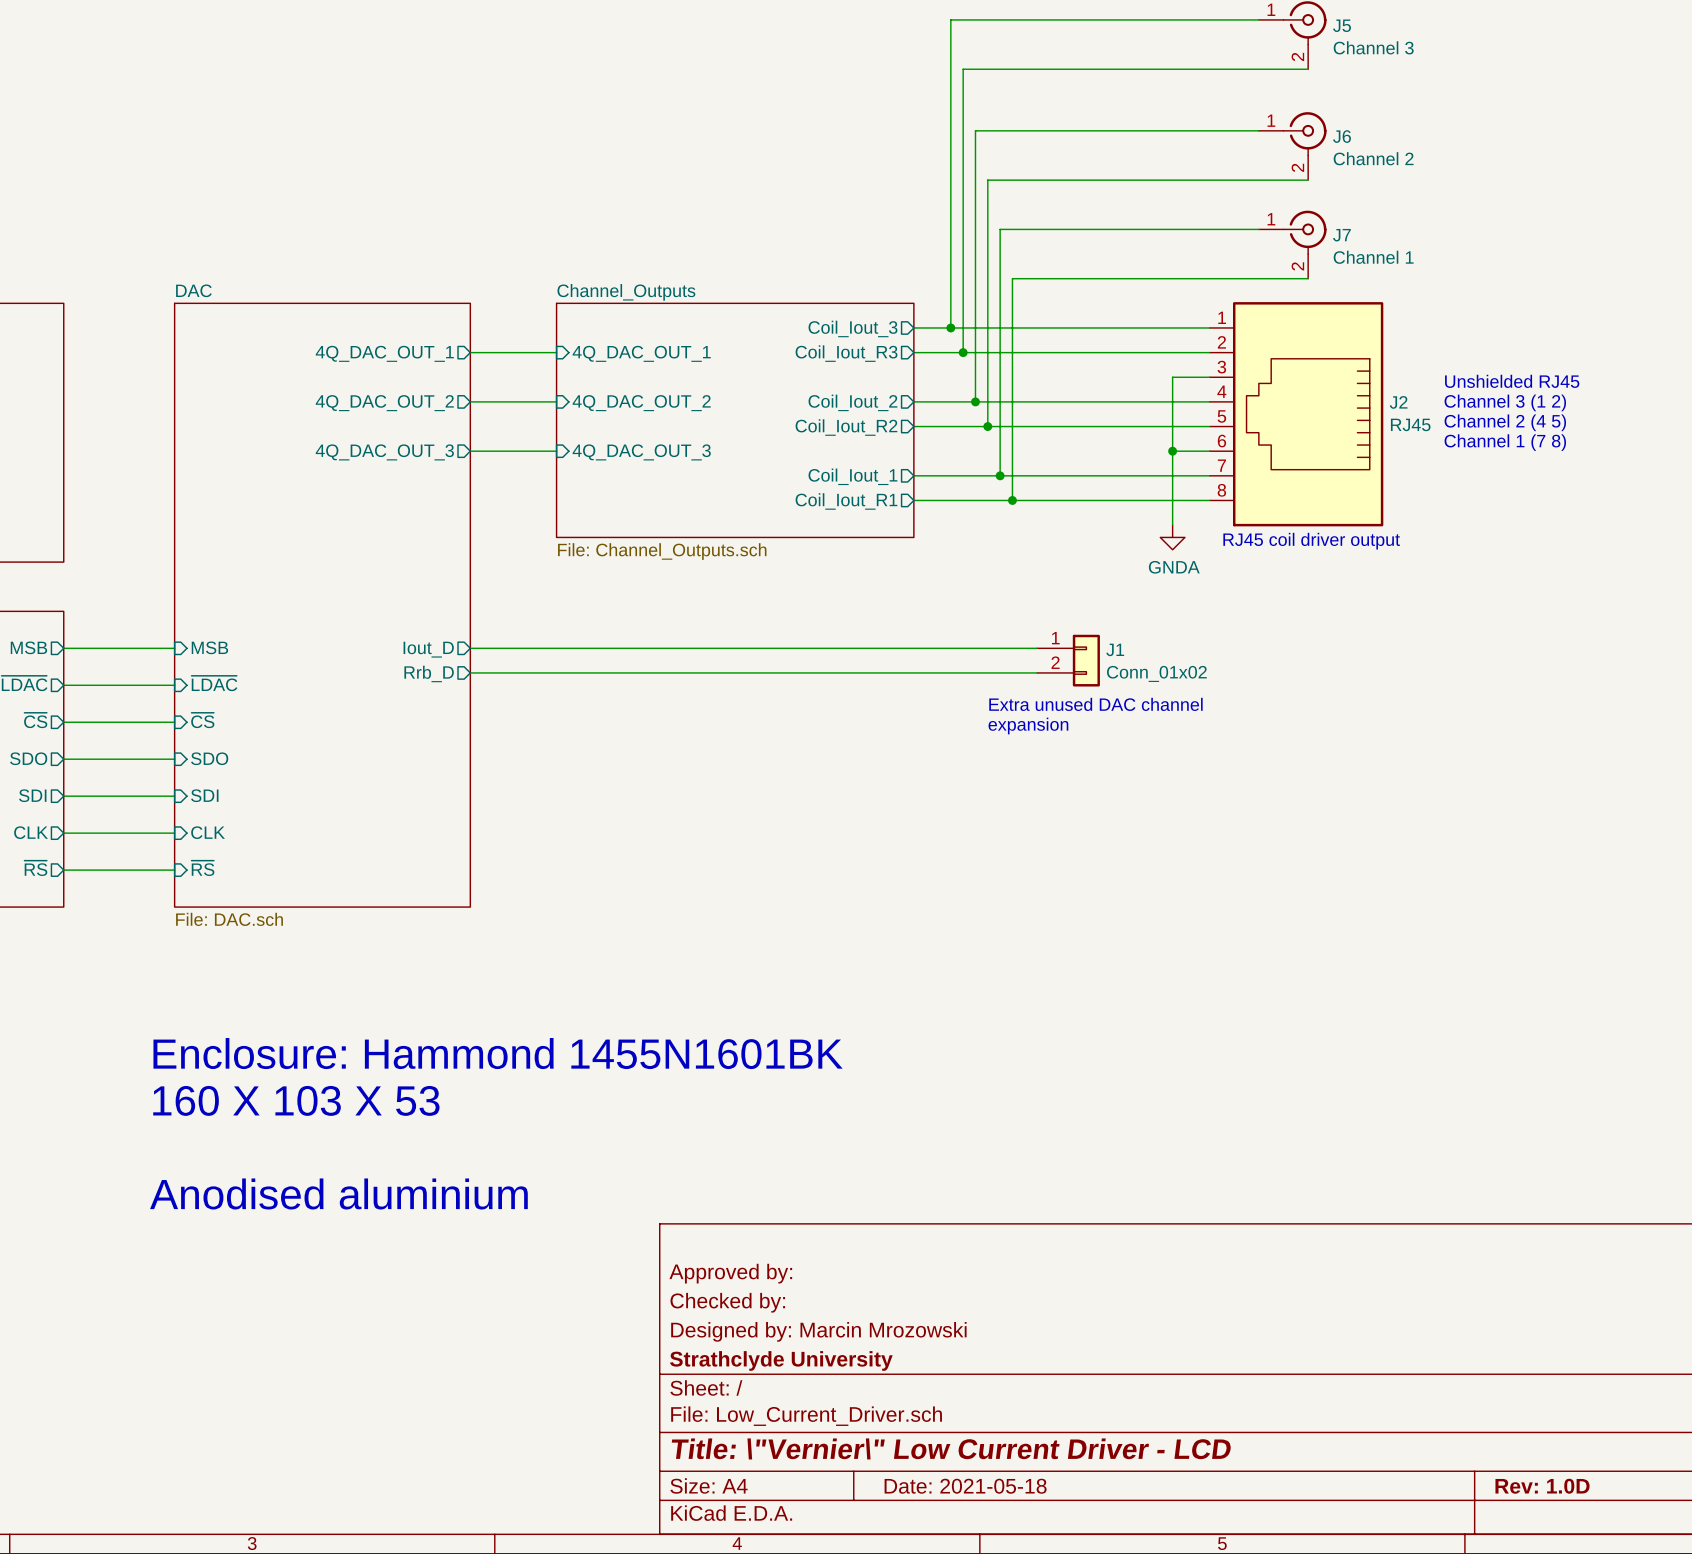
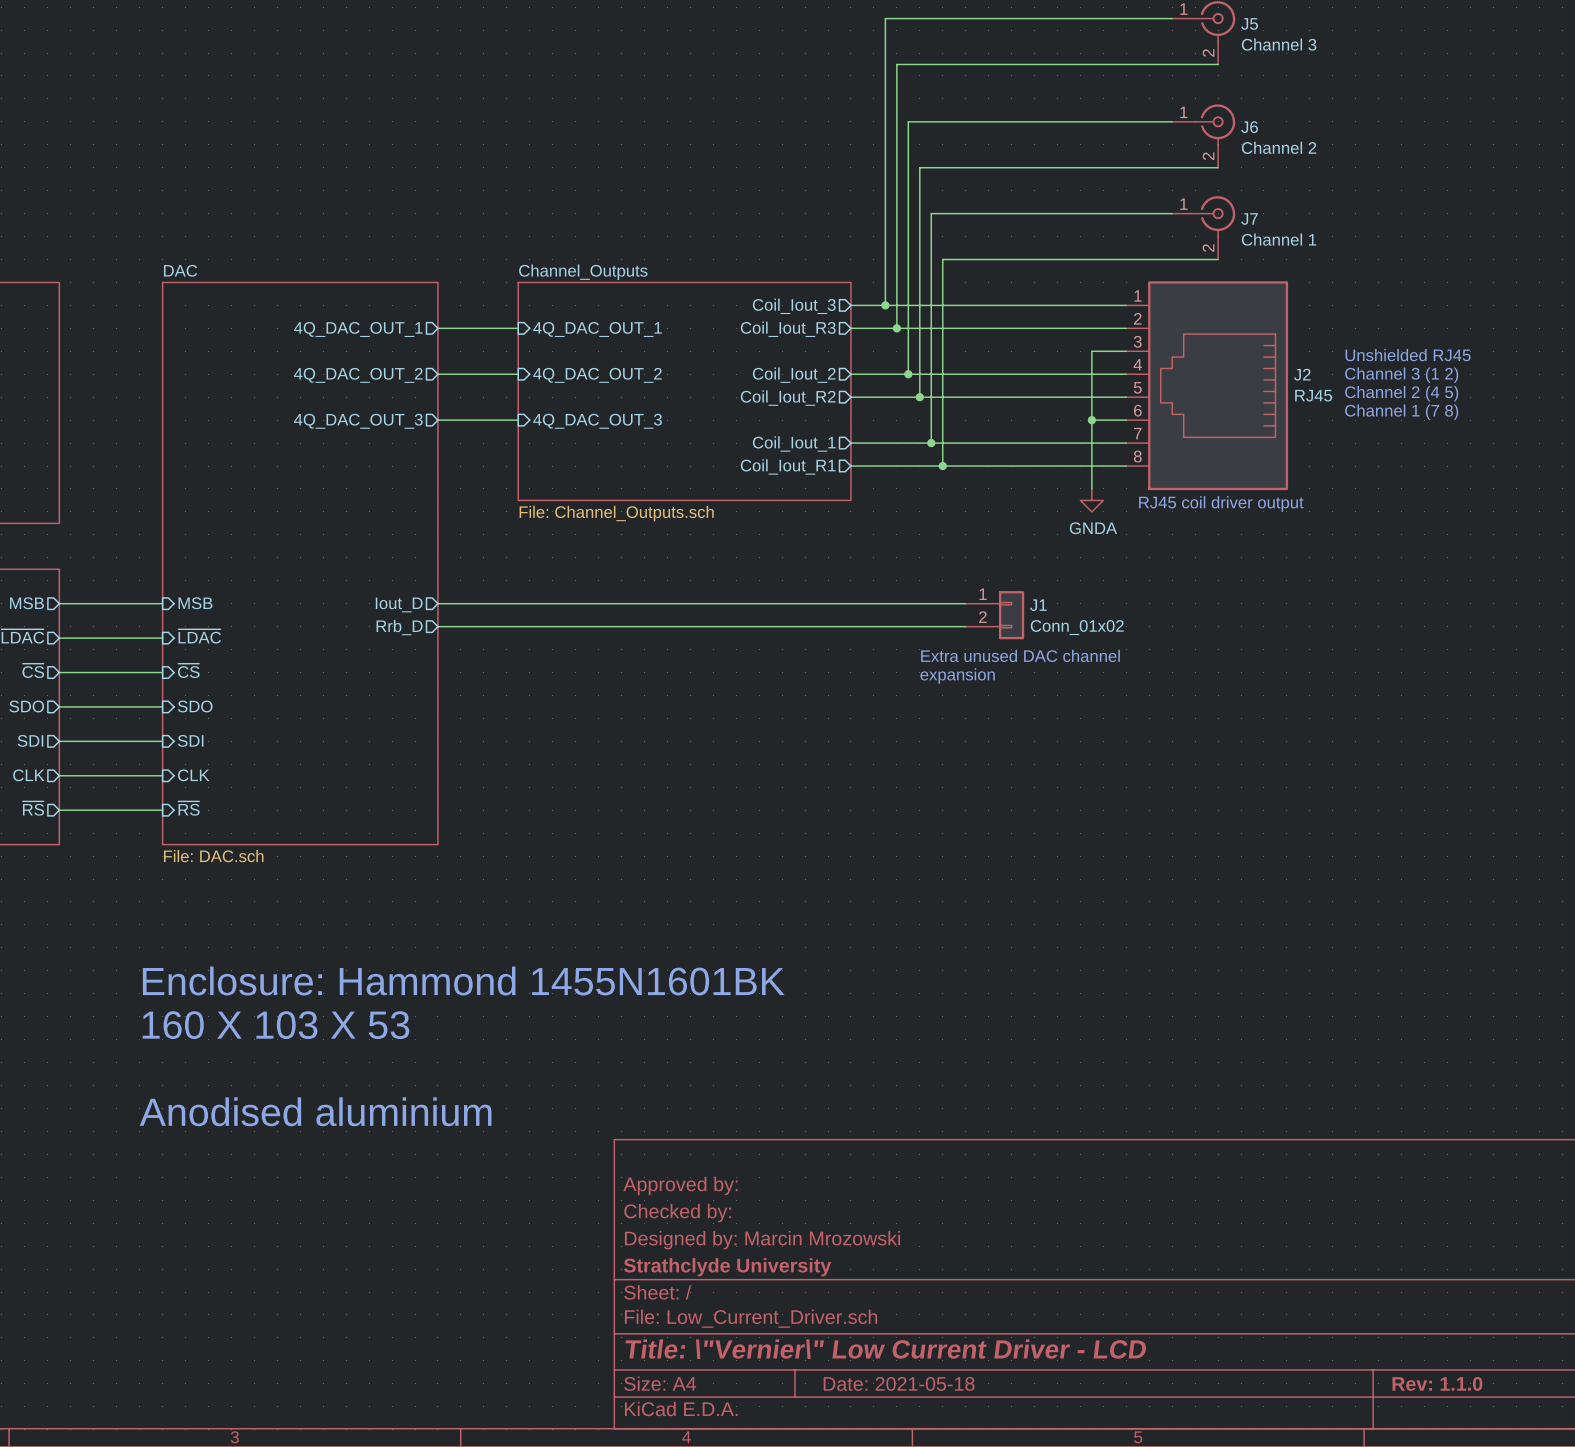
title block: Rev: 1.0D (1542, 1486) -> Rev: 1.1.0 (1437, 1383)

